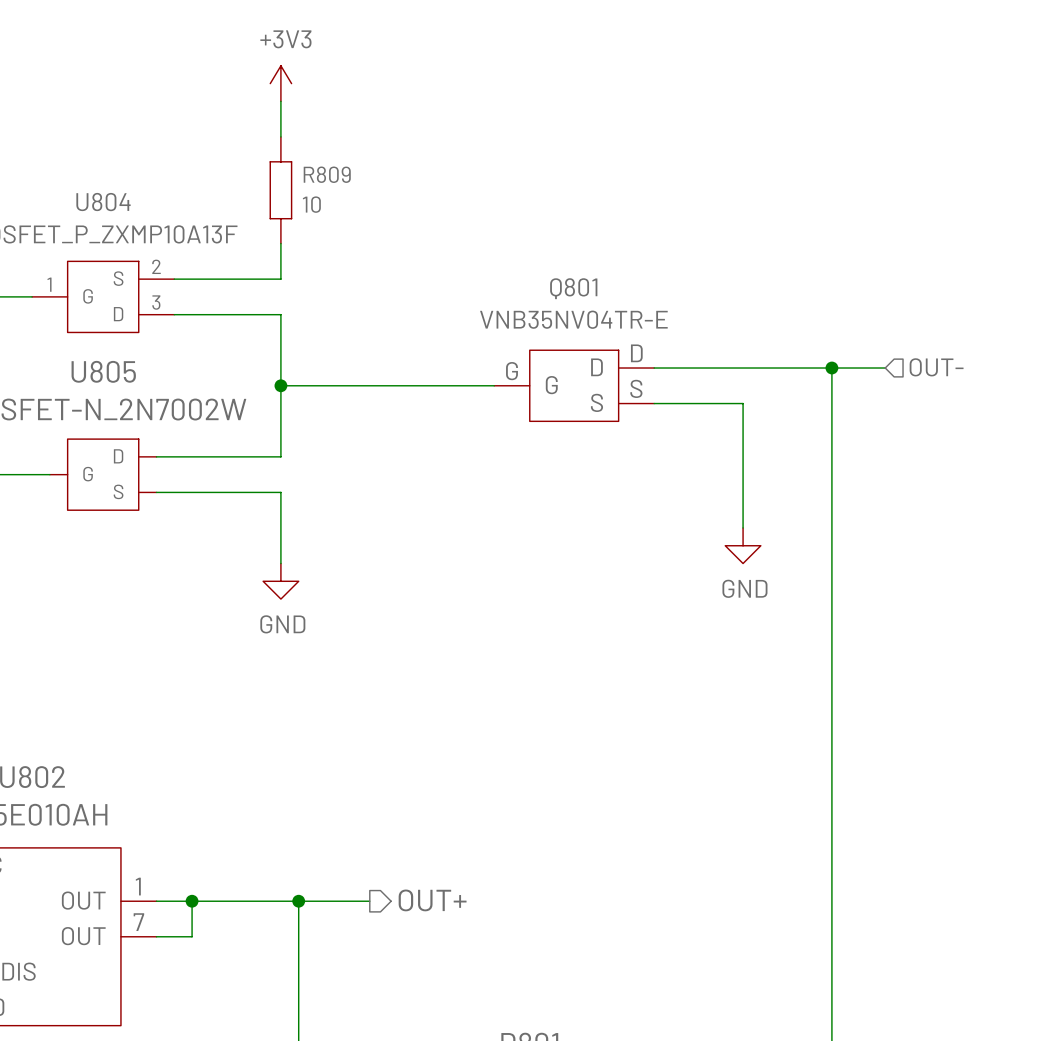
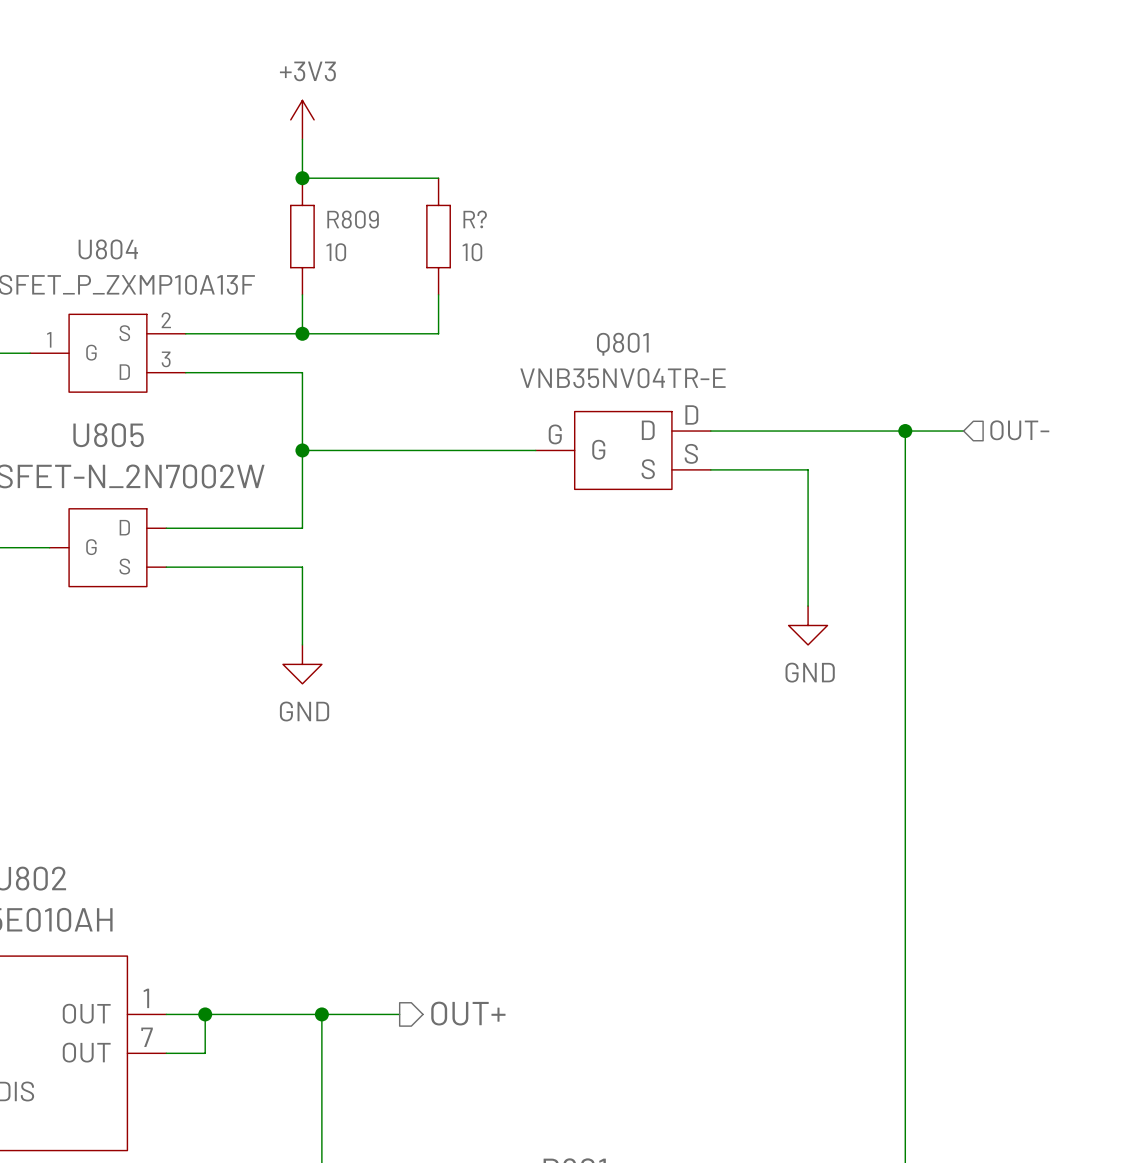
wire: none -> (302, 178) (438, 178)
junction: none -> (302, 178)
R?: none -> 10 (438, 236)
wire: none -> (438, 294) (438, 333) (302, 333)
junction: none -> (302, 333)

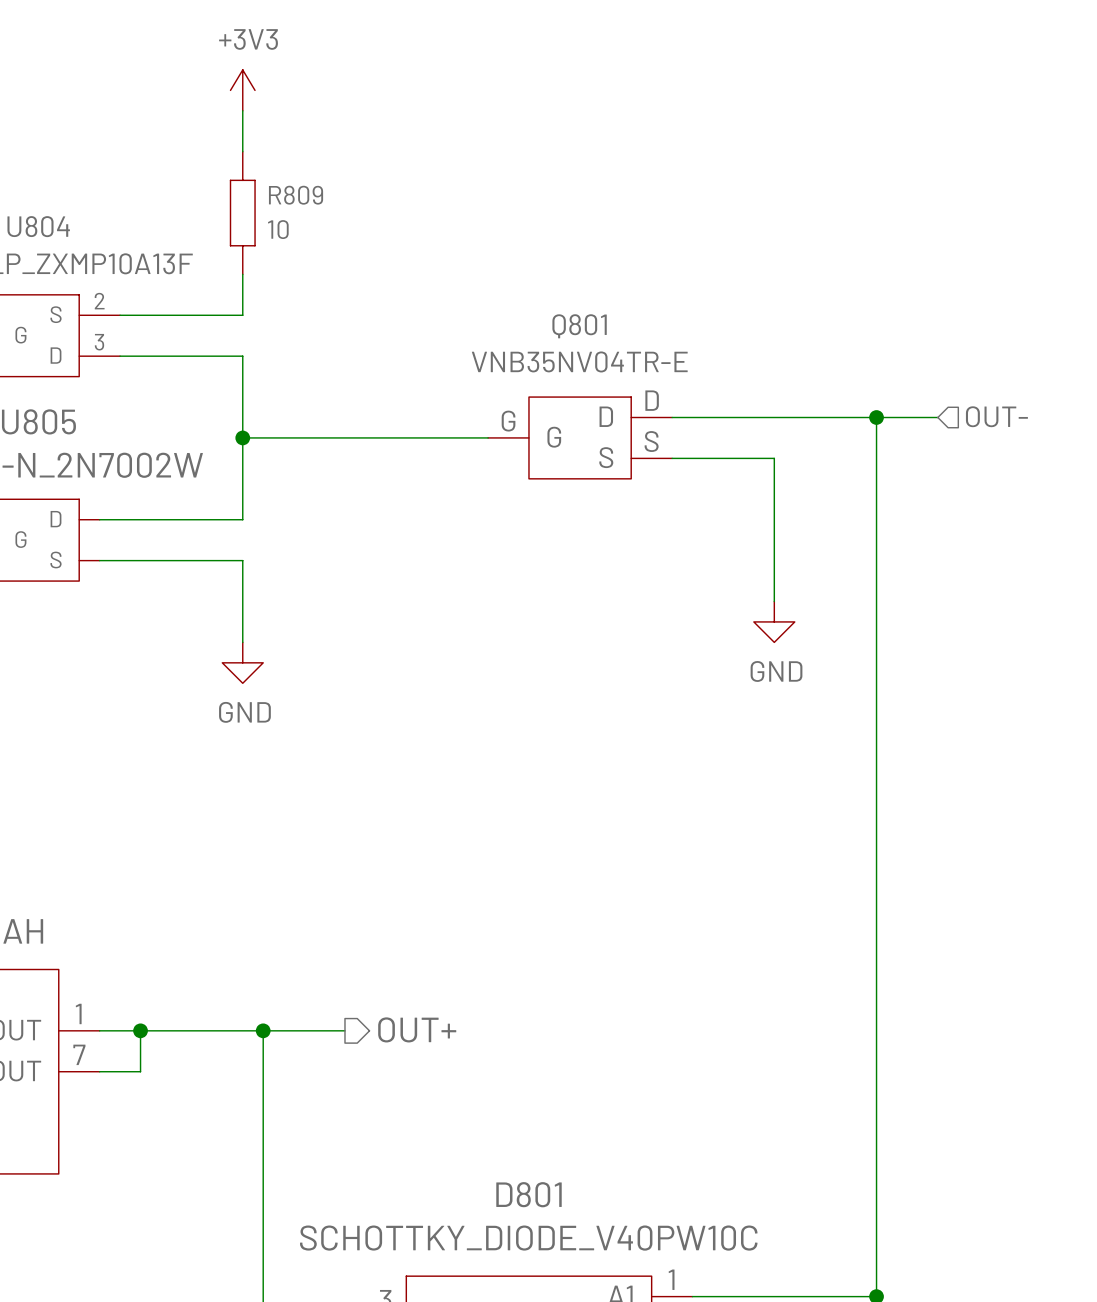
wire: (302, 178) (438, 178) -> none
junction: (302, 178) -> none
R?: 10 (438, 236) -> none
wire: (438, 294) (438, 333) (302, 333) -> none
junction: (302, 333) -> none

